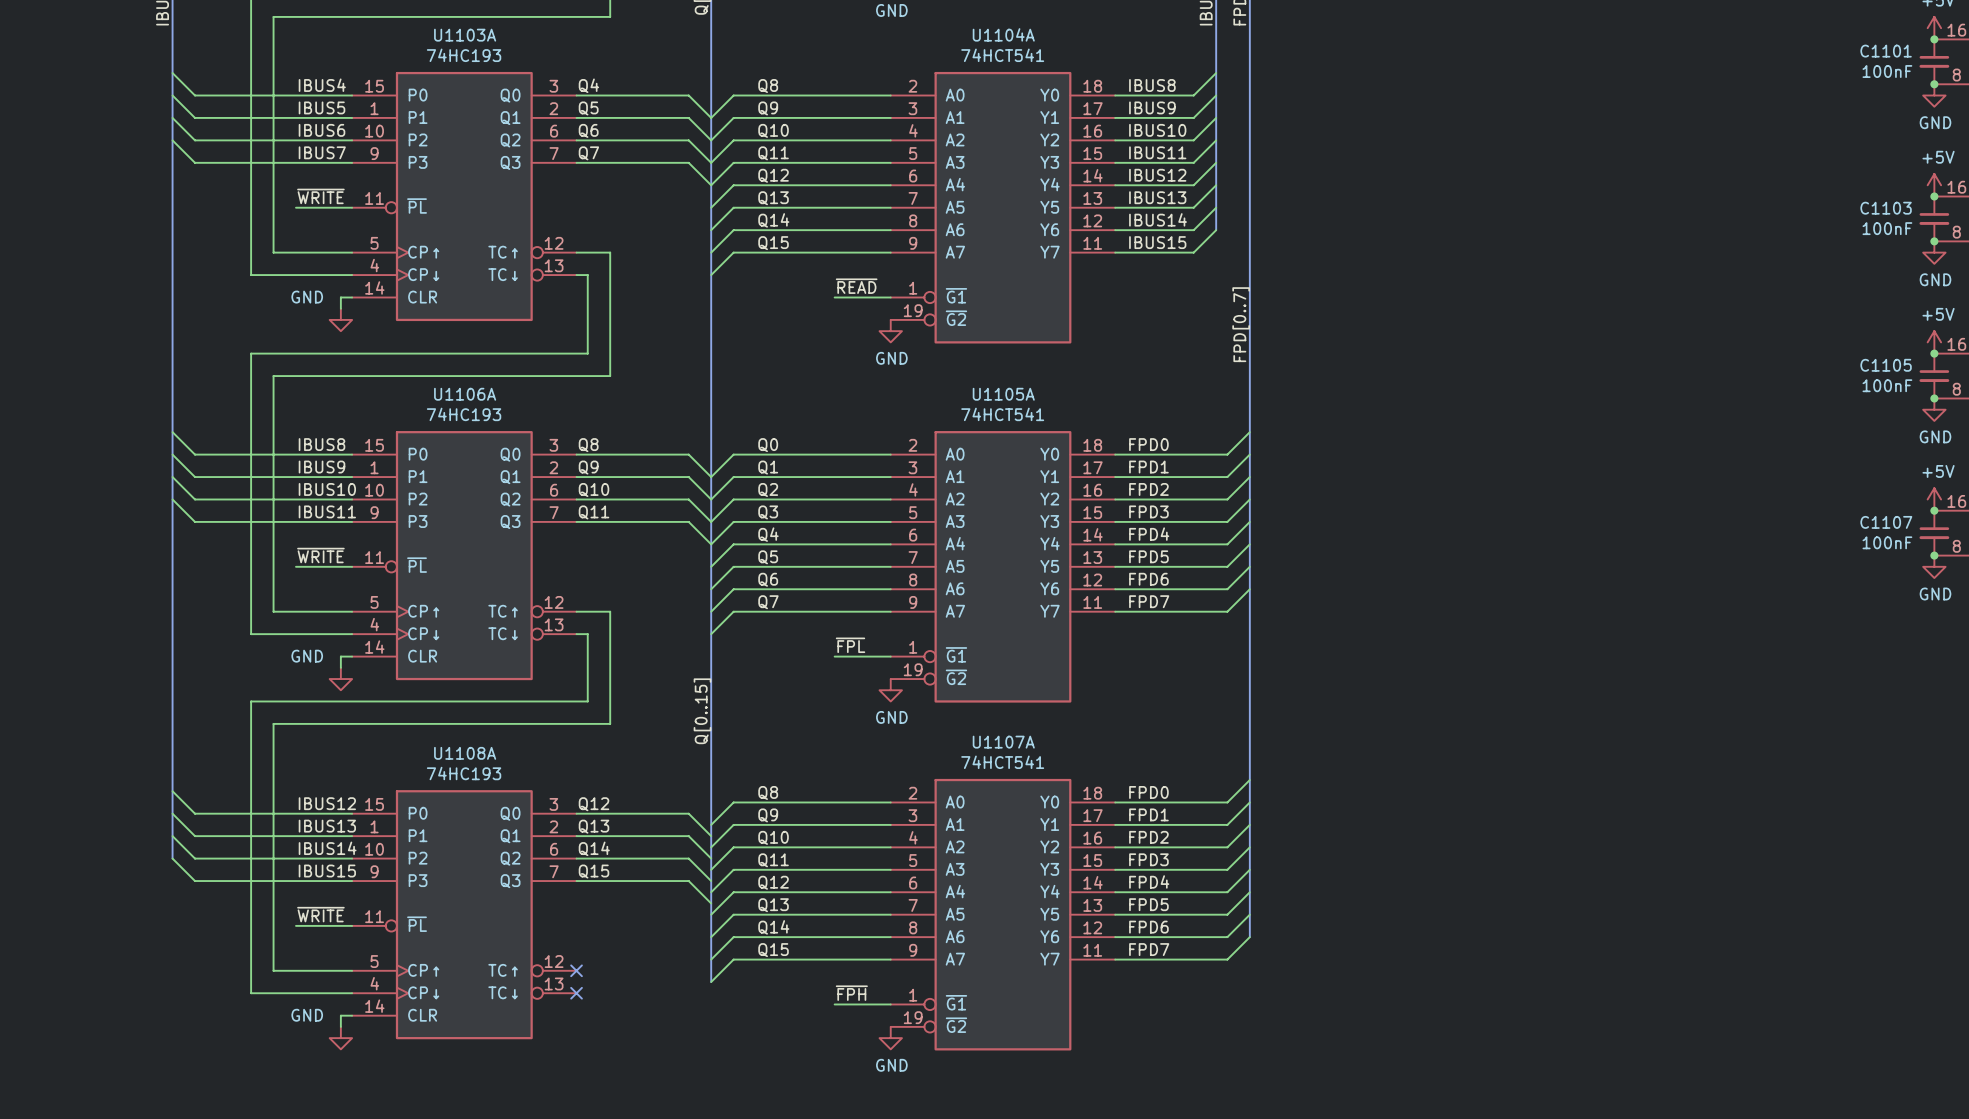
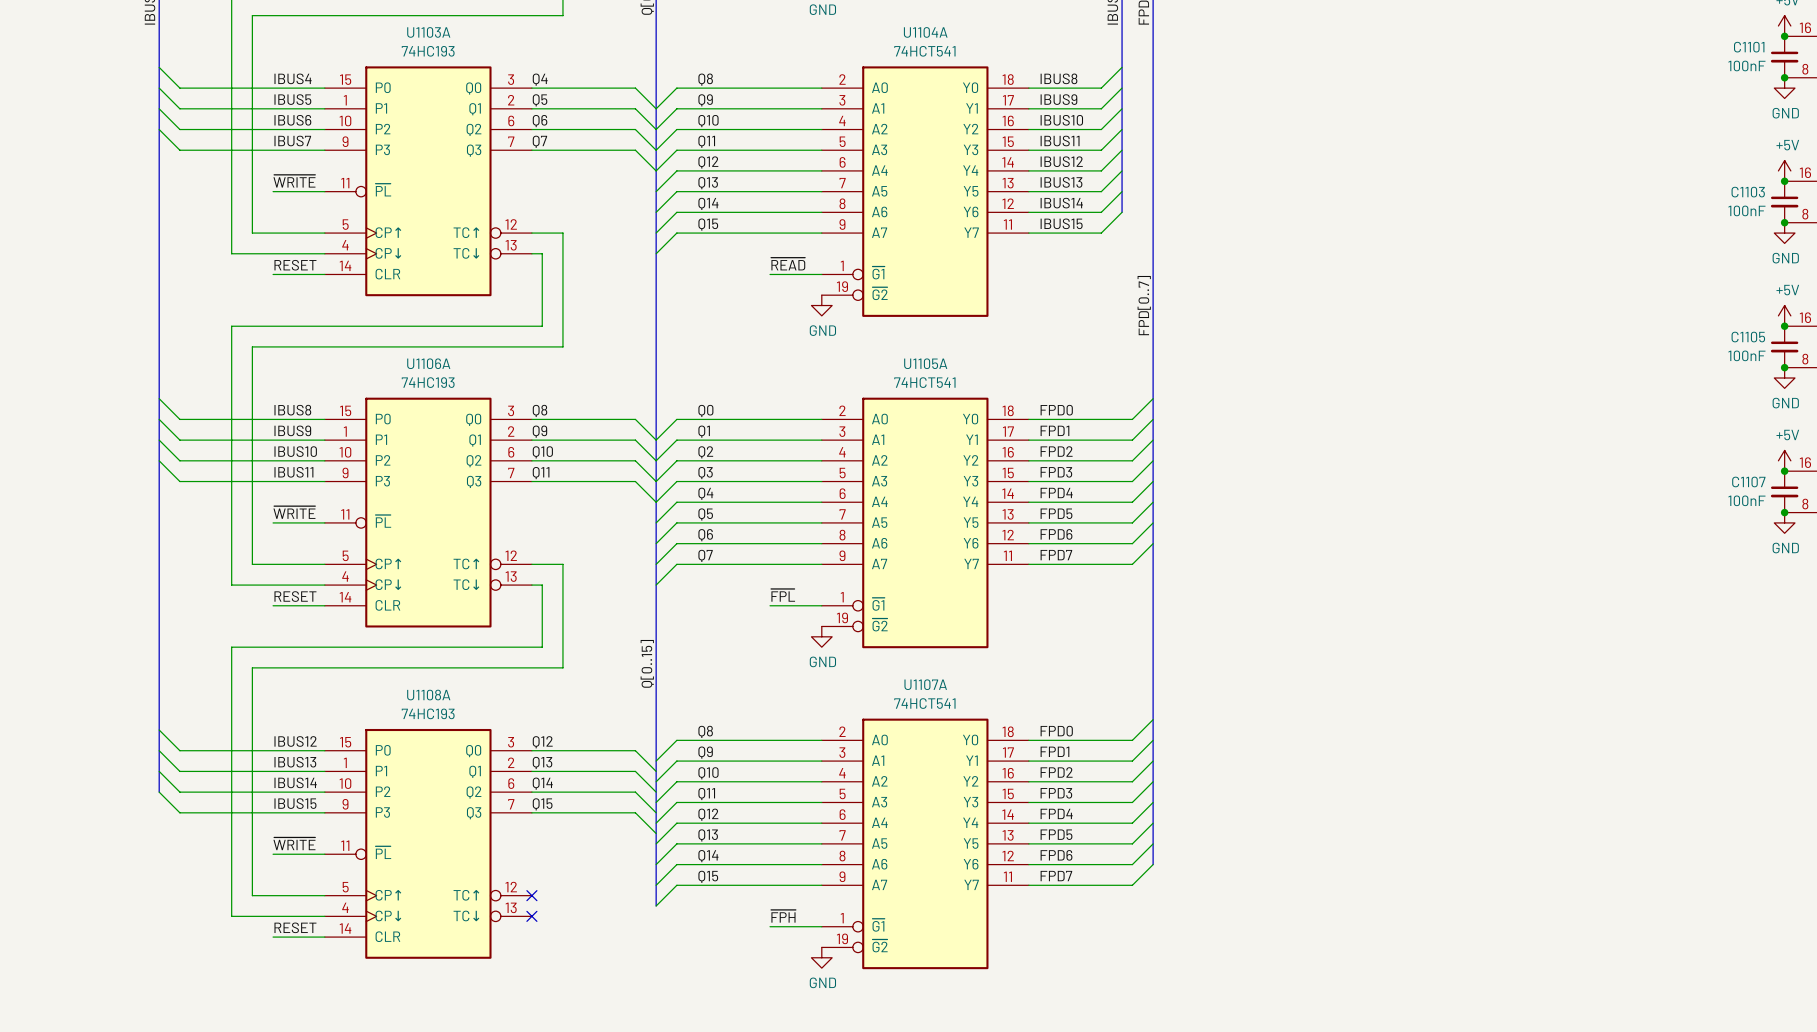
label: none -> RESET (295, 265)
wire: (340, 297) (340, 308) -> (314, 274) (273, 274)
power symbol: GND (340, 319) -> none
label: none -> RESET (295, 596)
wire: (340, 656) (340, 667) -> (314, 605) (273, 605)
power symbol: GND (340, 679) -> none
label: none -> RESET (295, 927)
wire: (340, 1015) (340, 1026) -> (314, 937) (273, 937)
power symbol: GND (340, 1038) -> none

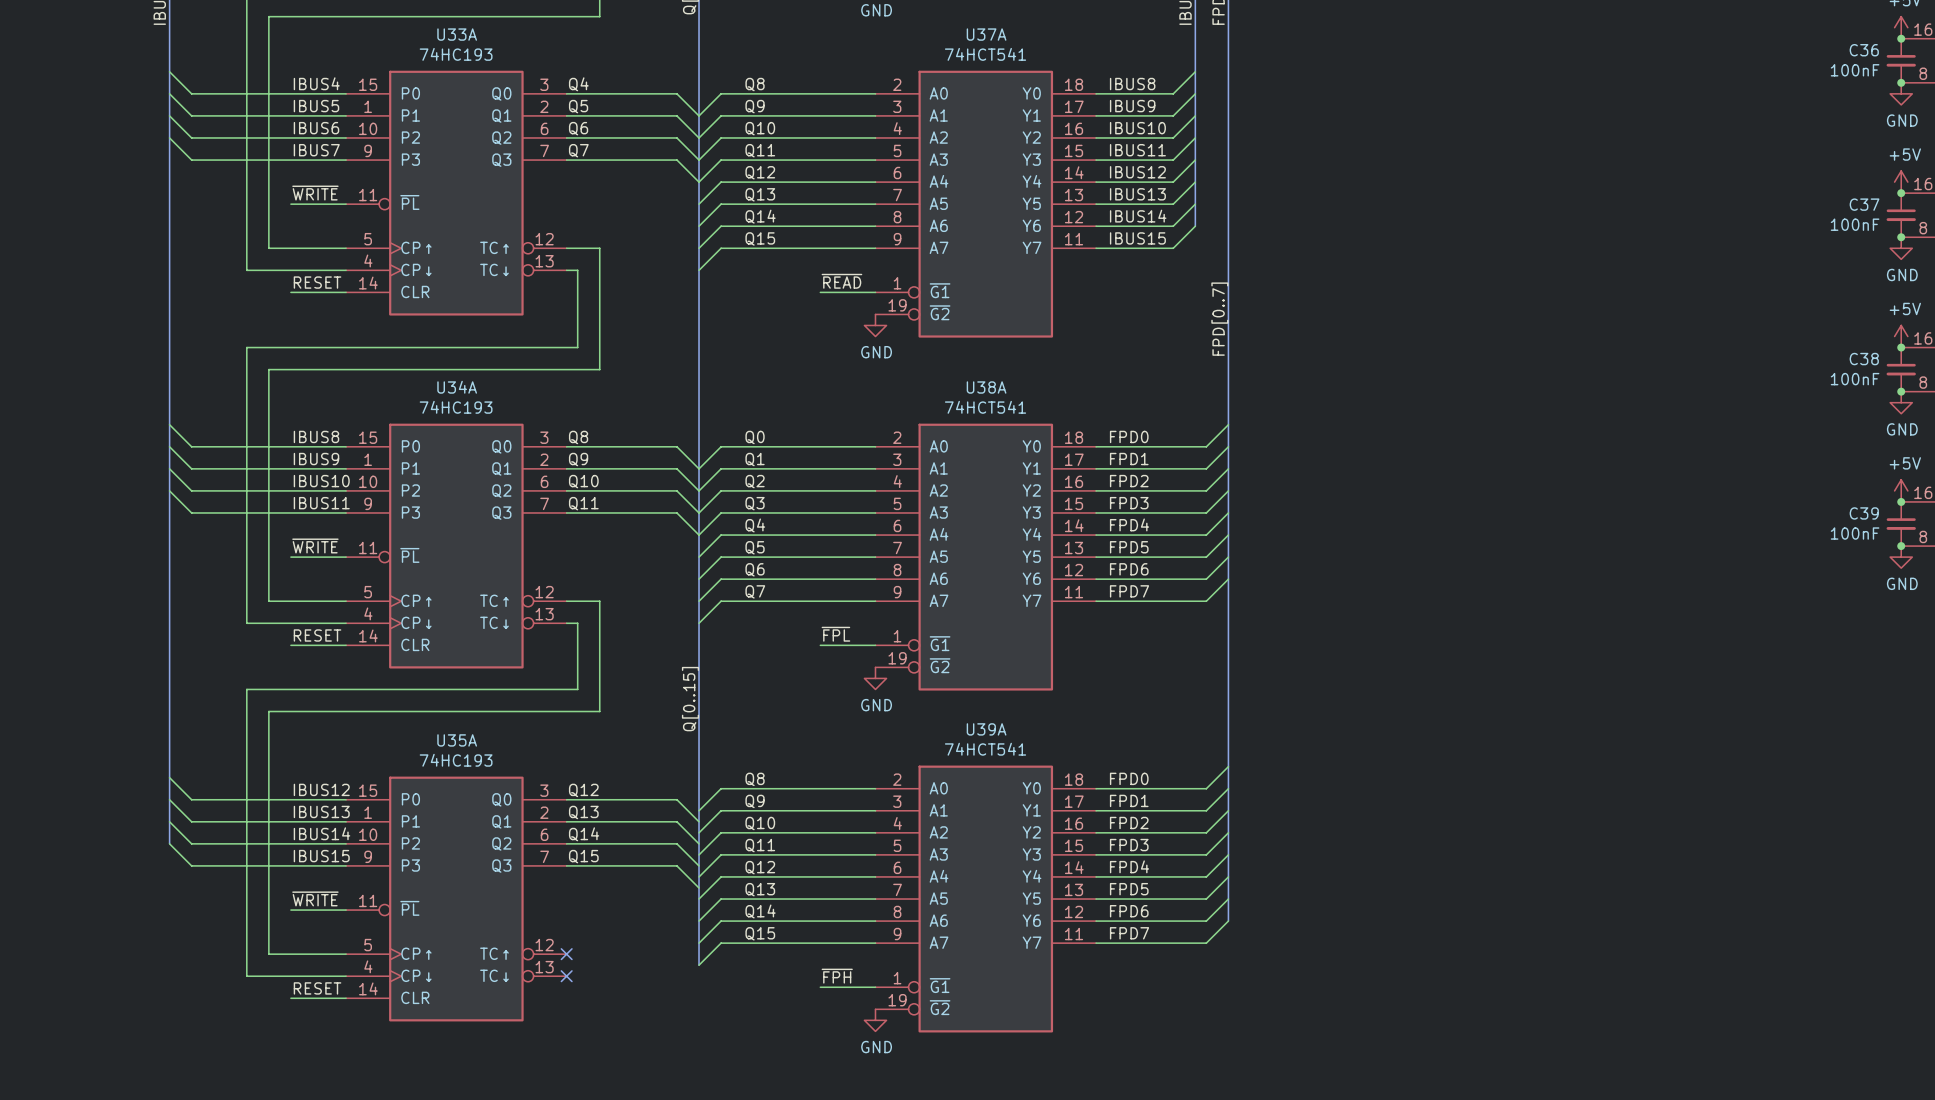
U1103A name: U1103A (428, 32) -> U33A (457, 34)
U1104A name: U1104A (925, 32) -> U37A (986, 34)
C1101 name: C1101 (1749, 47) -> C36 (1864, 50)
C1103 name: C1103 (1748, 192) -> C37 (1864, 204)
C1105 name: C1105 (1748, 337) -> C38 (1864, 359)
U1106A name: U1106A (428, 363) -> U34A (457, 387)
U1105A name: U1105A (925, 363) -> U38A (986, 387)
C1107 name: C1107 (1748, 481) -> C39 (1864, 513)
U1107A name: U1107A (925, 684) -> U39A (986, 729)
U1108A name: U1108A (428, 695) -> U35A (457, 740)

